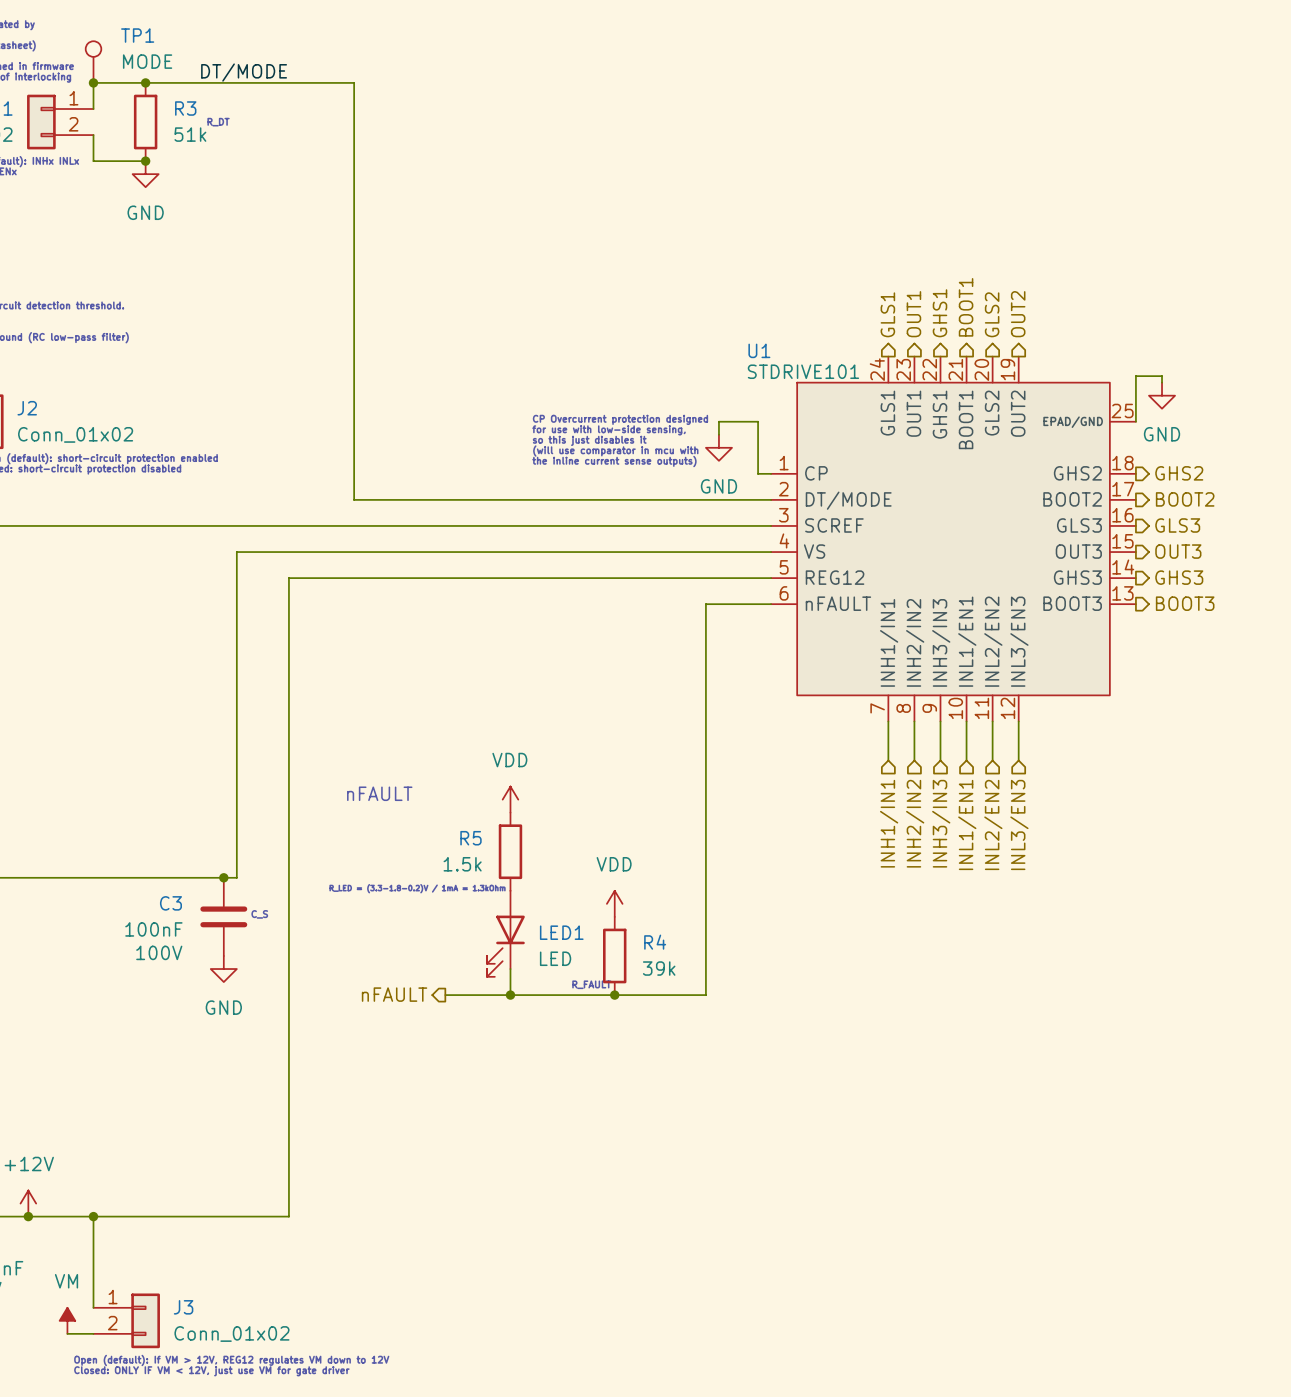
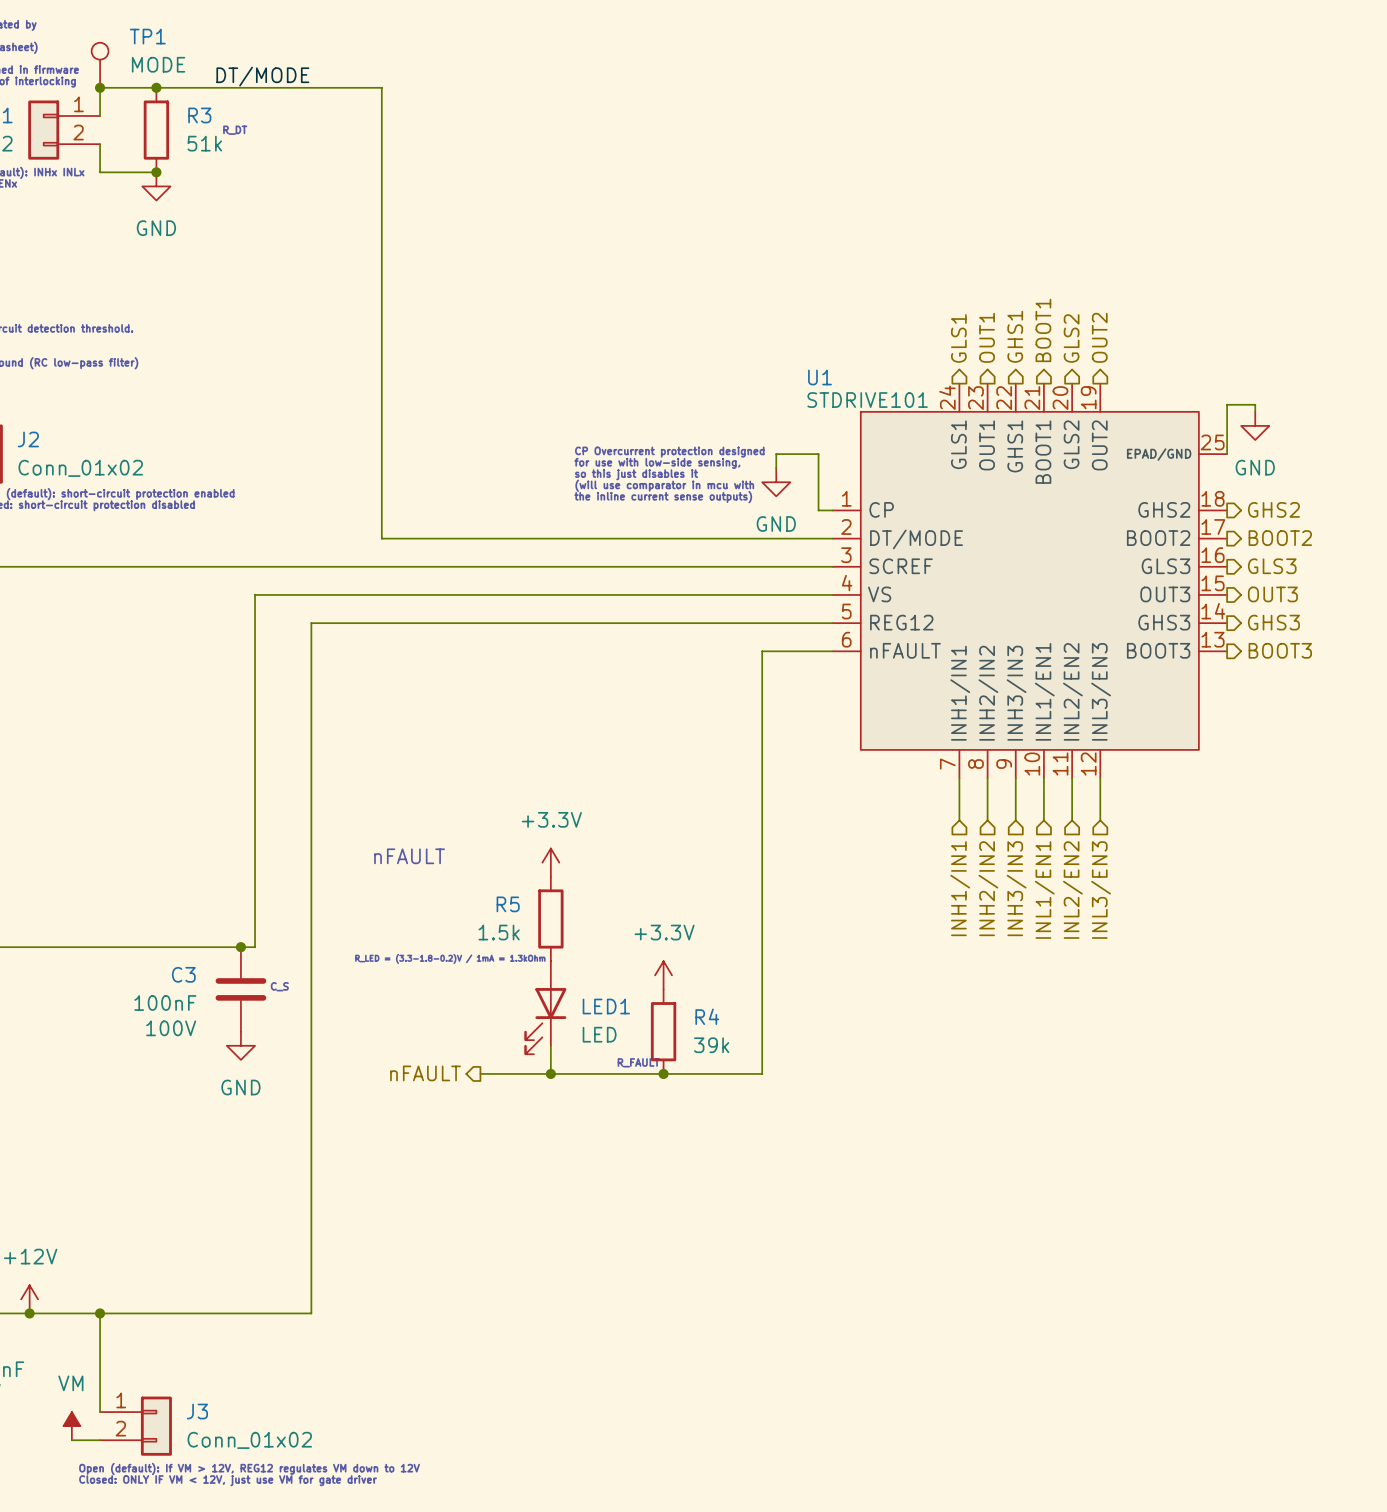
power symbol: VDD (510, 799) -> +3.3V (550, 862)
power symbol: VDD (614, 903) -> +3.3V (663, 975)

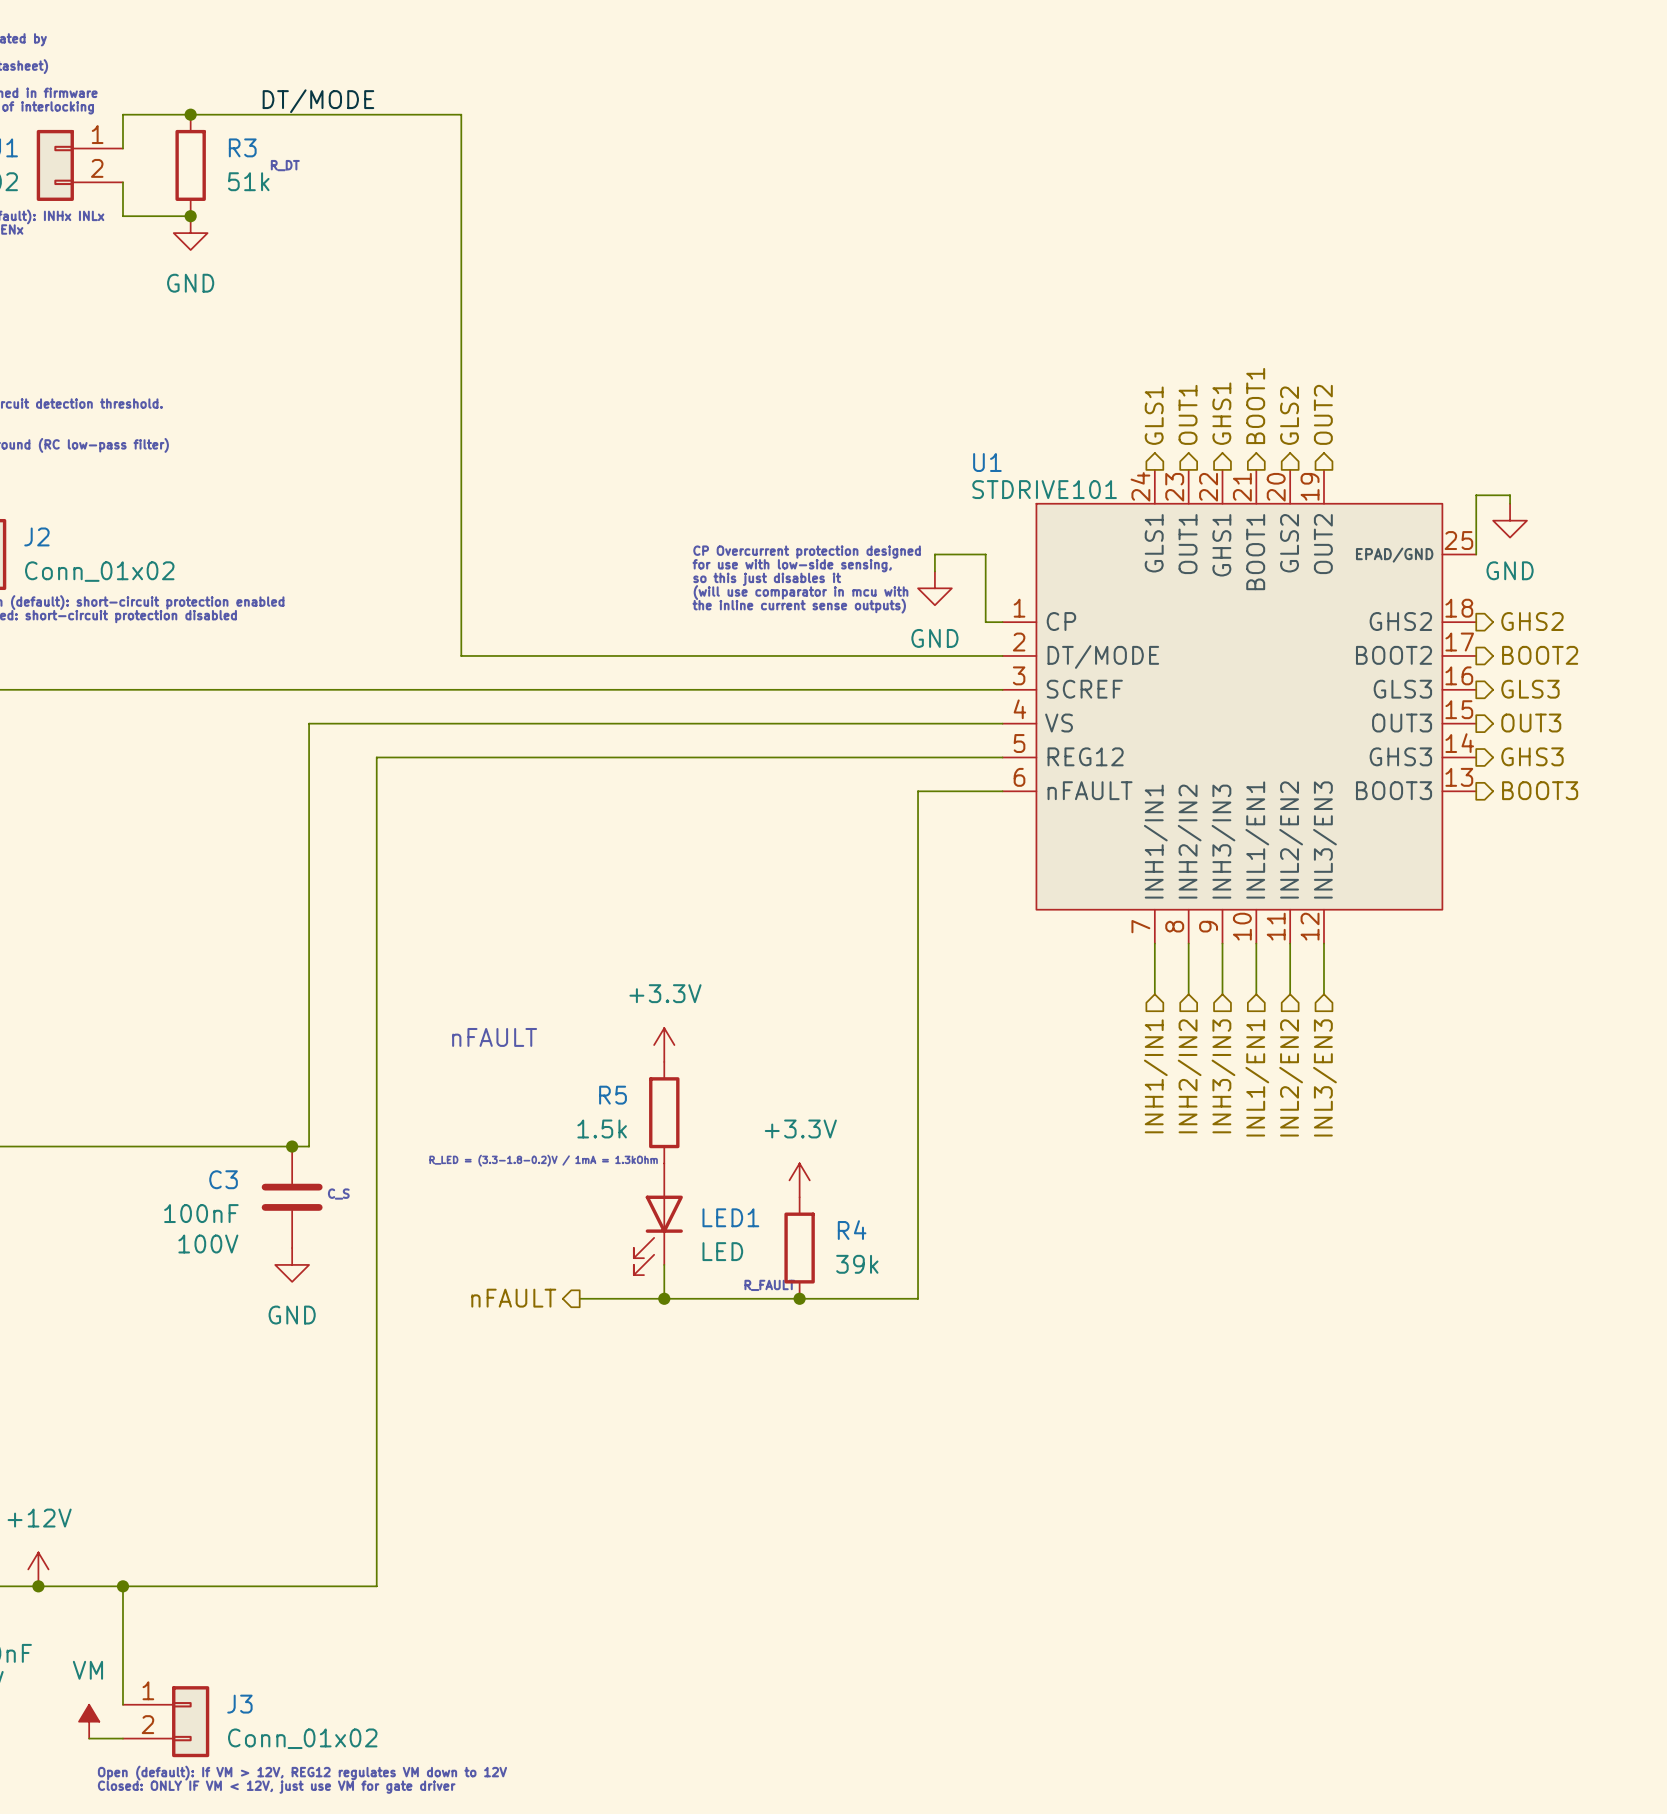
TP1: MODE (100, 65) -> none
junction: (100, 87) -> none

